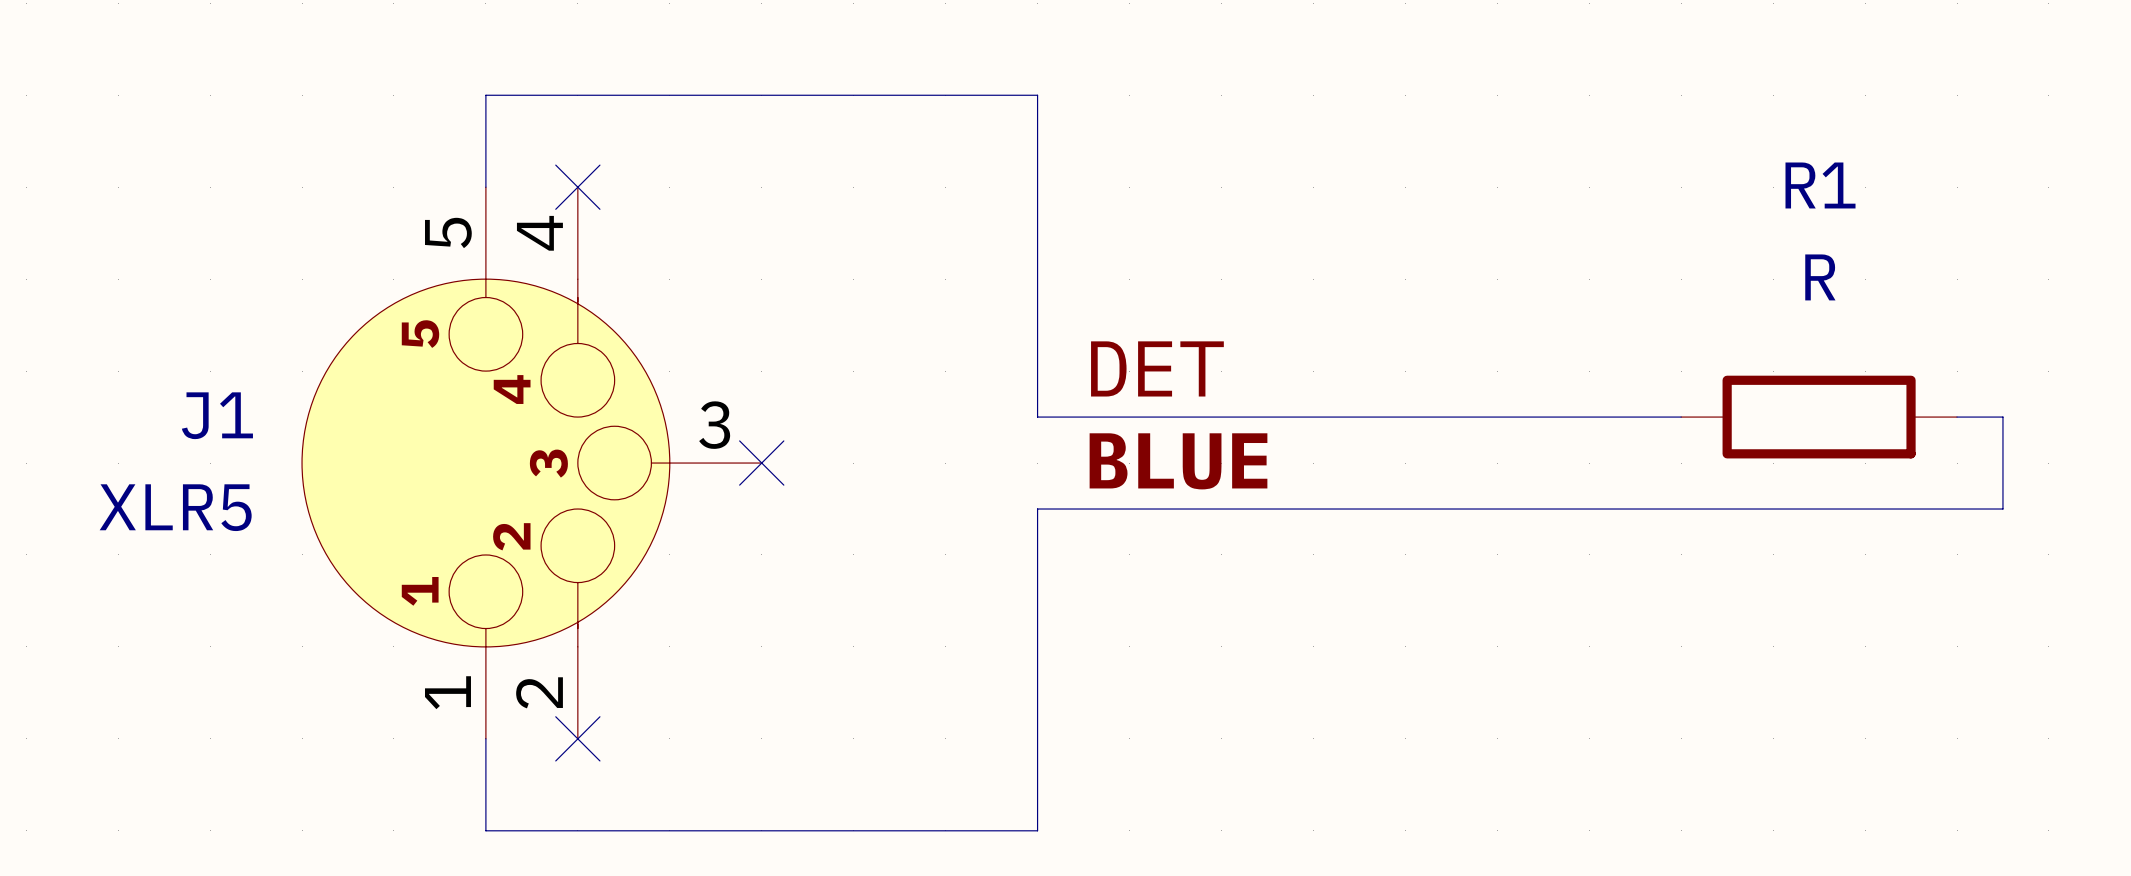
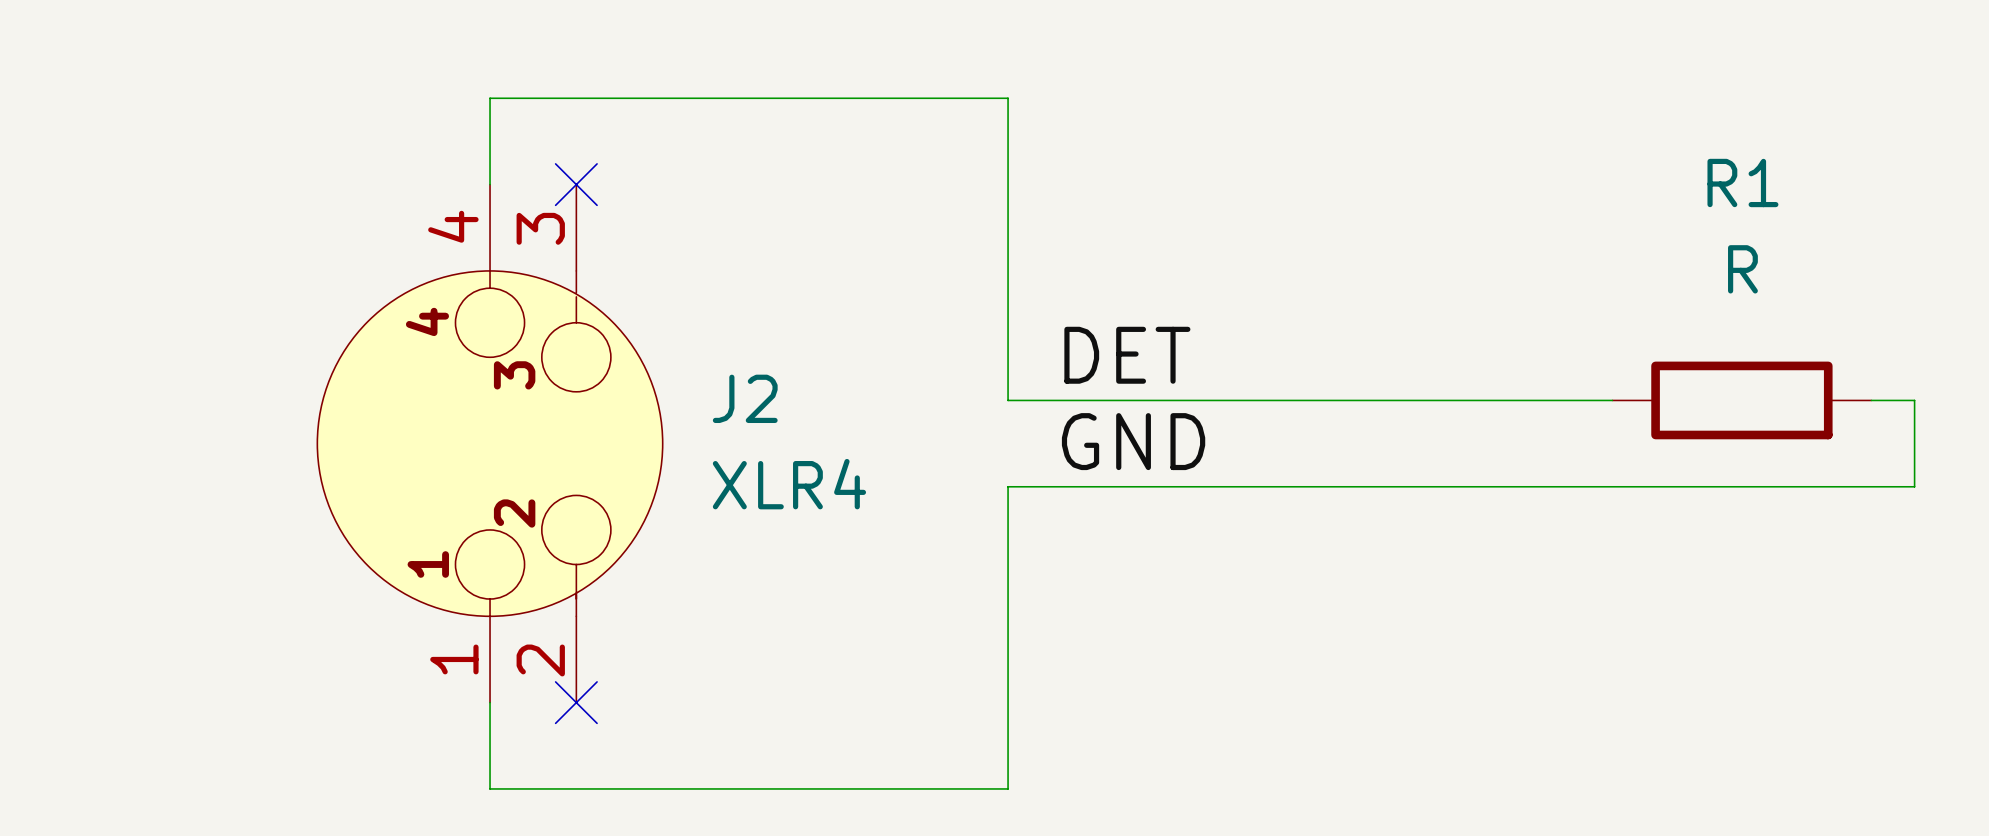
label: BLUE (1178, 461) -> GND (1133, 441)
J2: none -> XLR4 (490, 443)
J1: XLR5 (531, 463) -> none
no-connect mark: (761, 463) -> none

